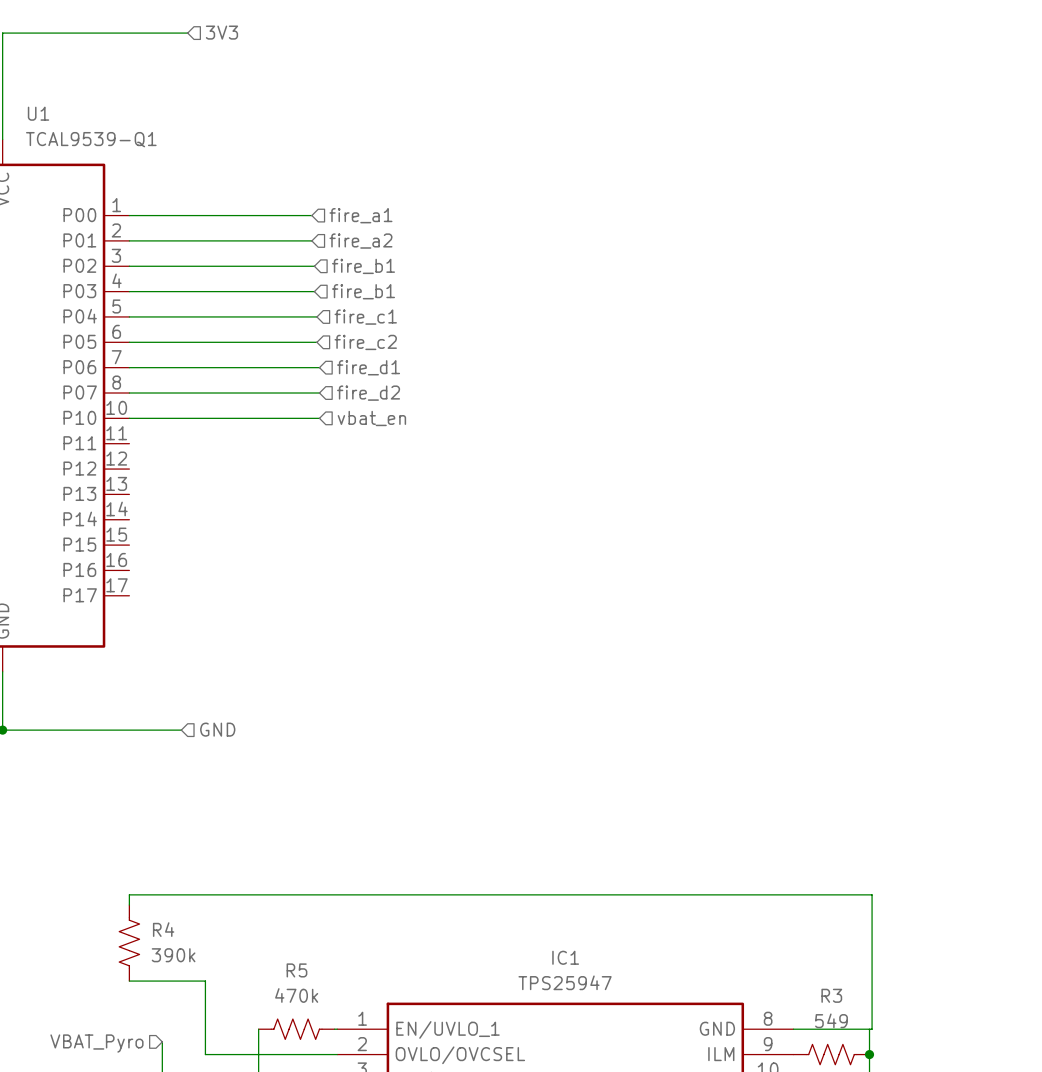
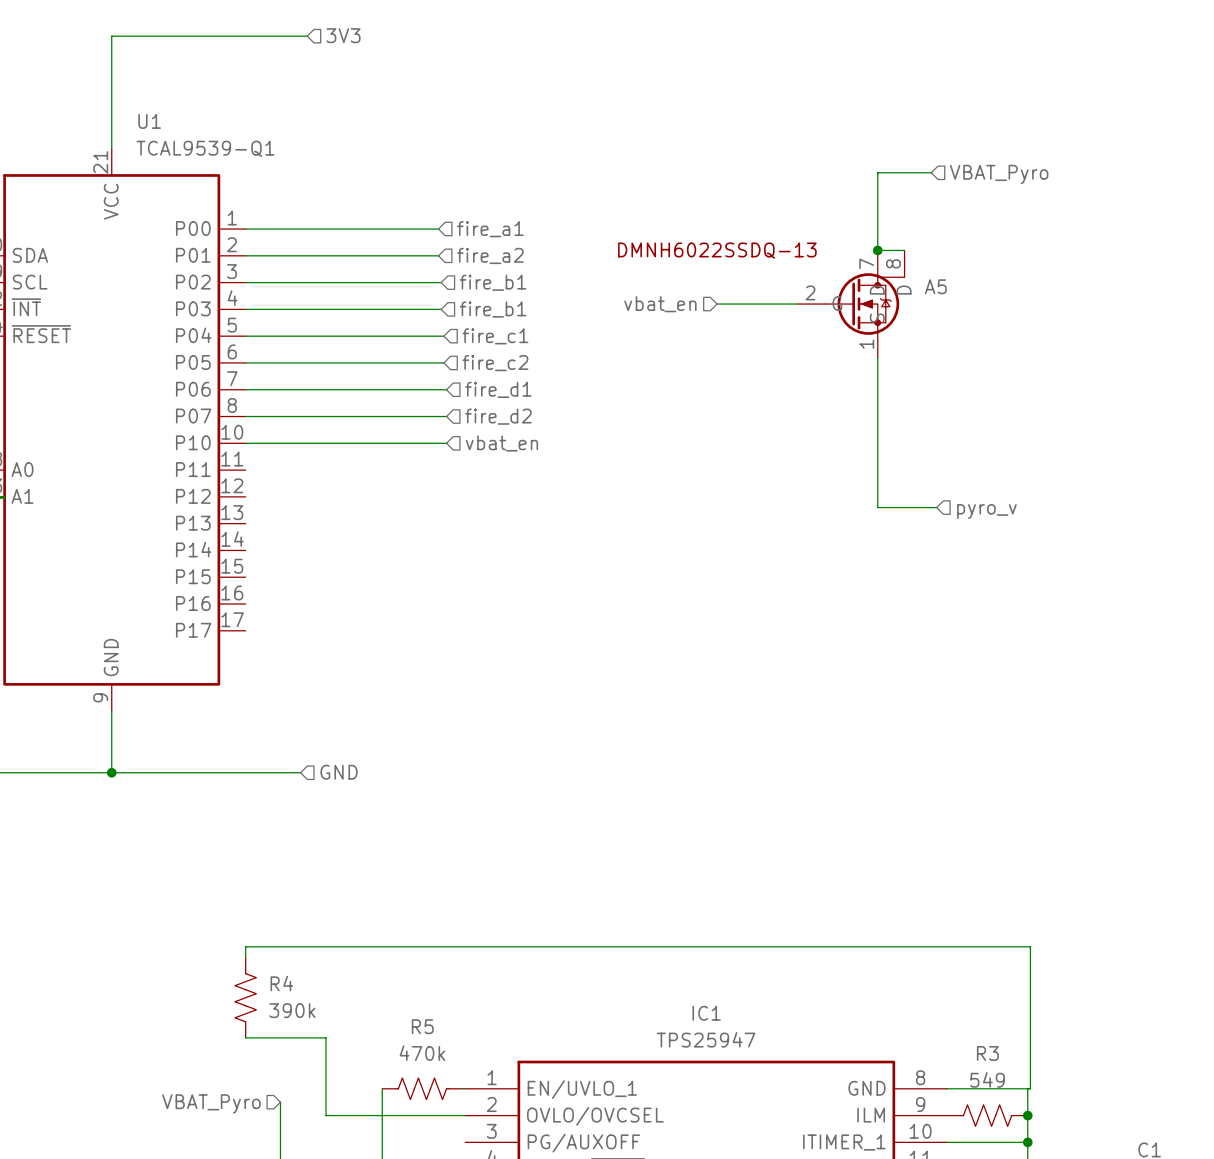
wire: none -> (931, 172) (877, 172) (877, 250) (904, 250)
hierarchical label: none -> VBAT_Pyro (999, 174)
junction: none -> (877, 250)
hierarchical label: none -> vbat_en (660, 304)
wire: none -> (717, 304) (797, 304)
A5: none -> (850, 304)
wire: none -> (877, 357) (877, 507) (936, 507)
hierarchical label: none -> pyro_v (986, 511)

